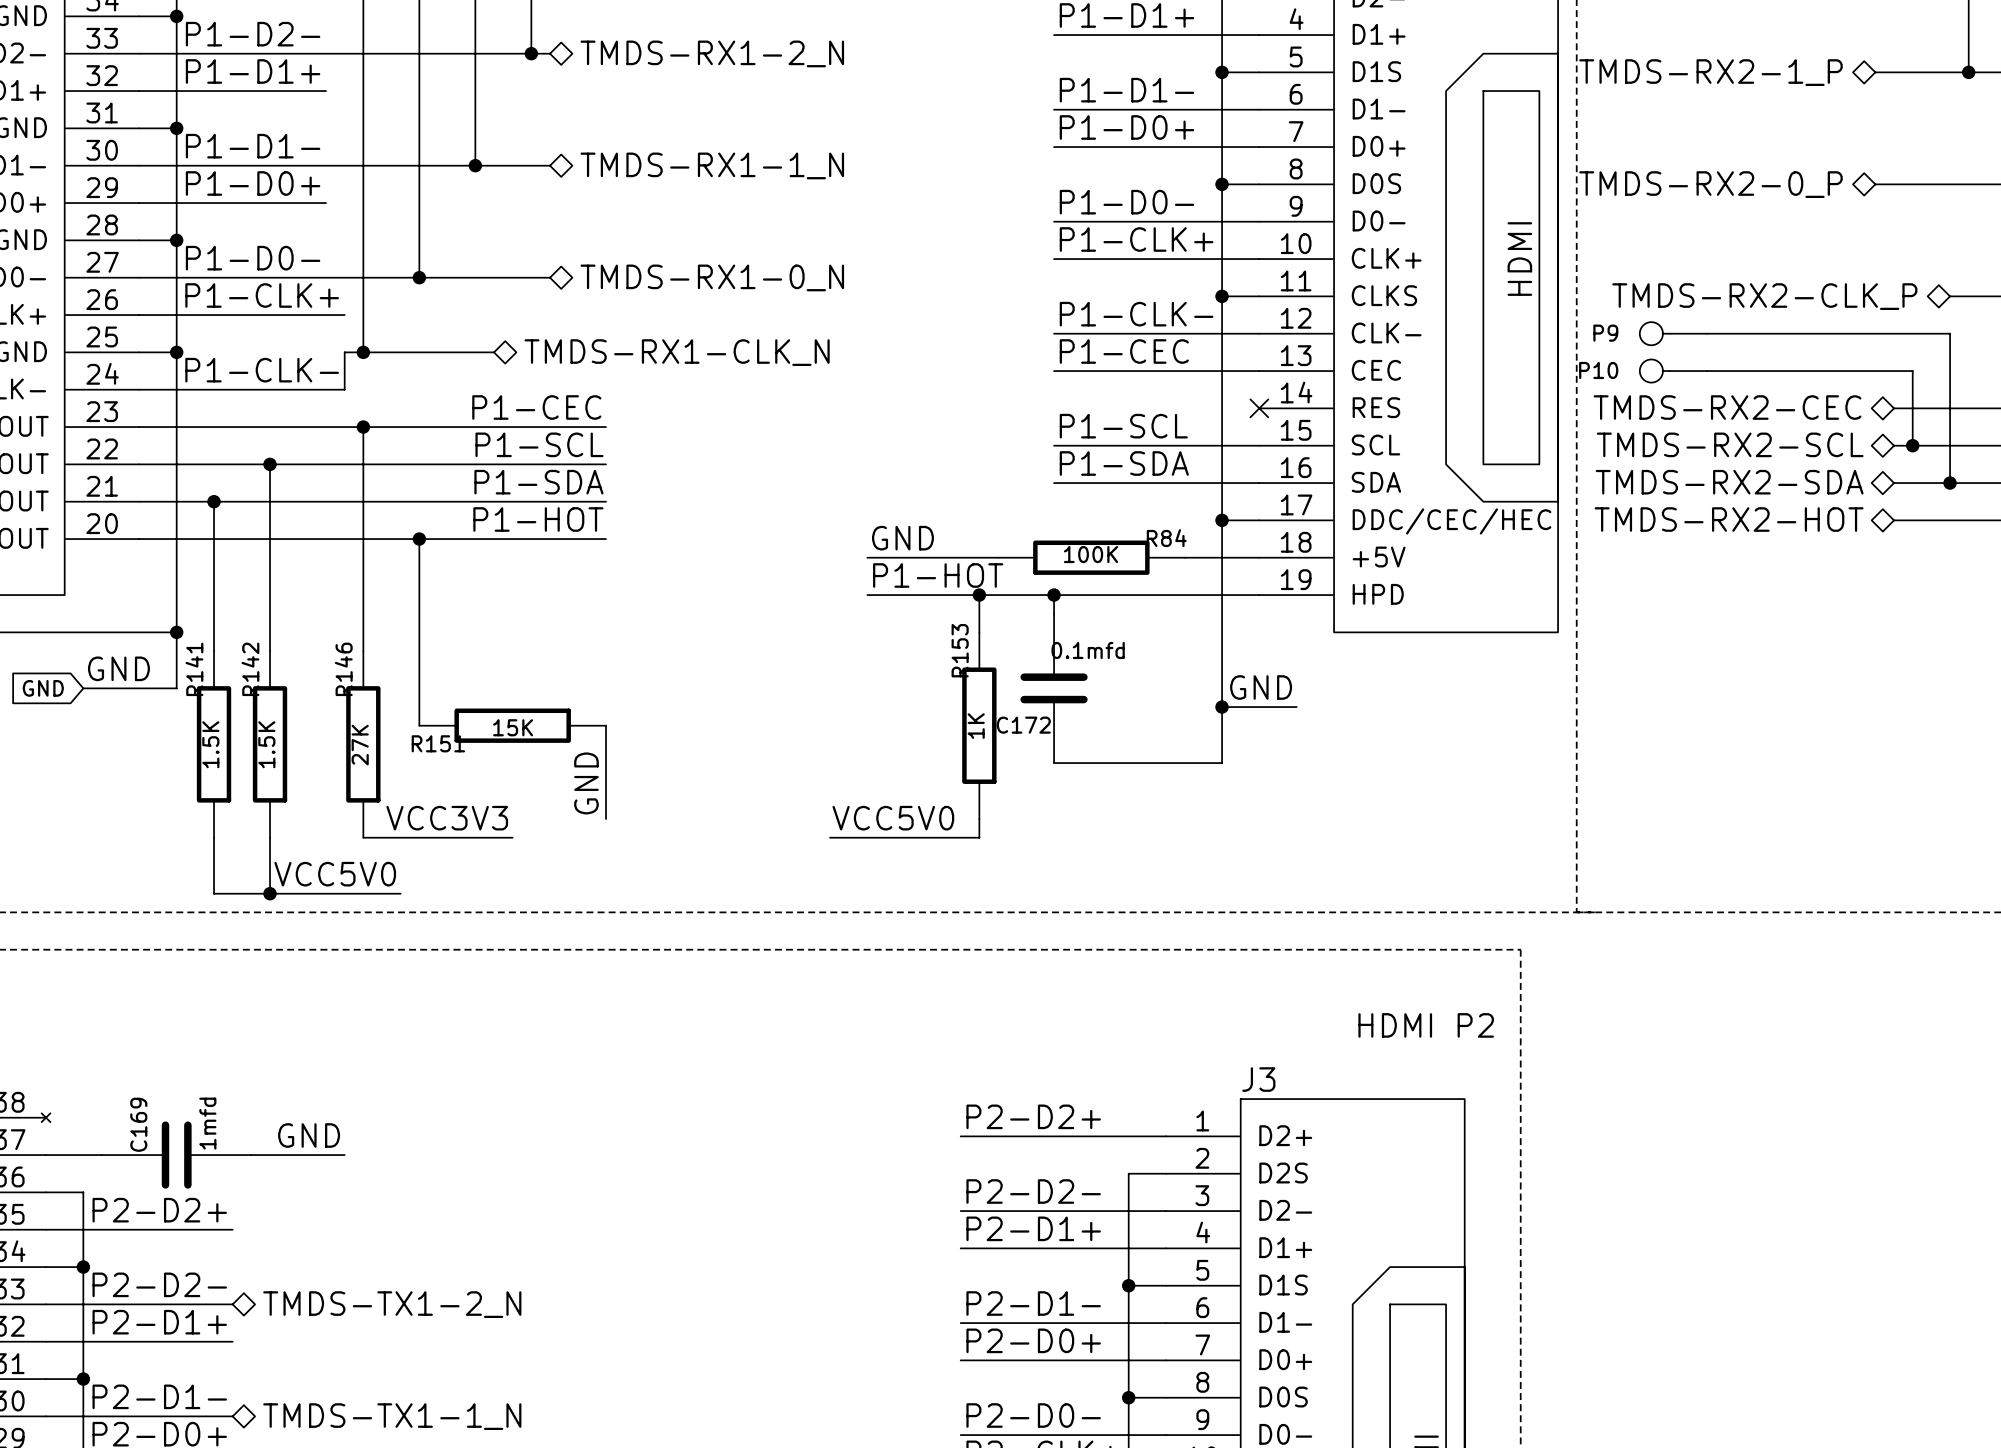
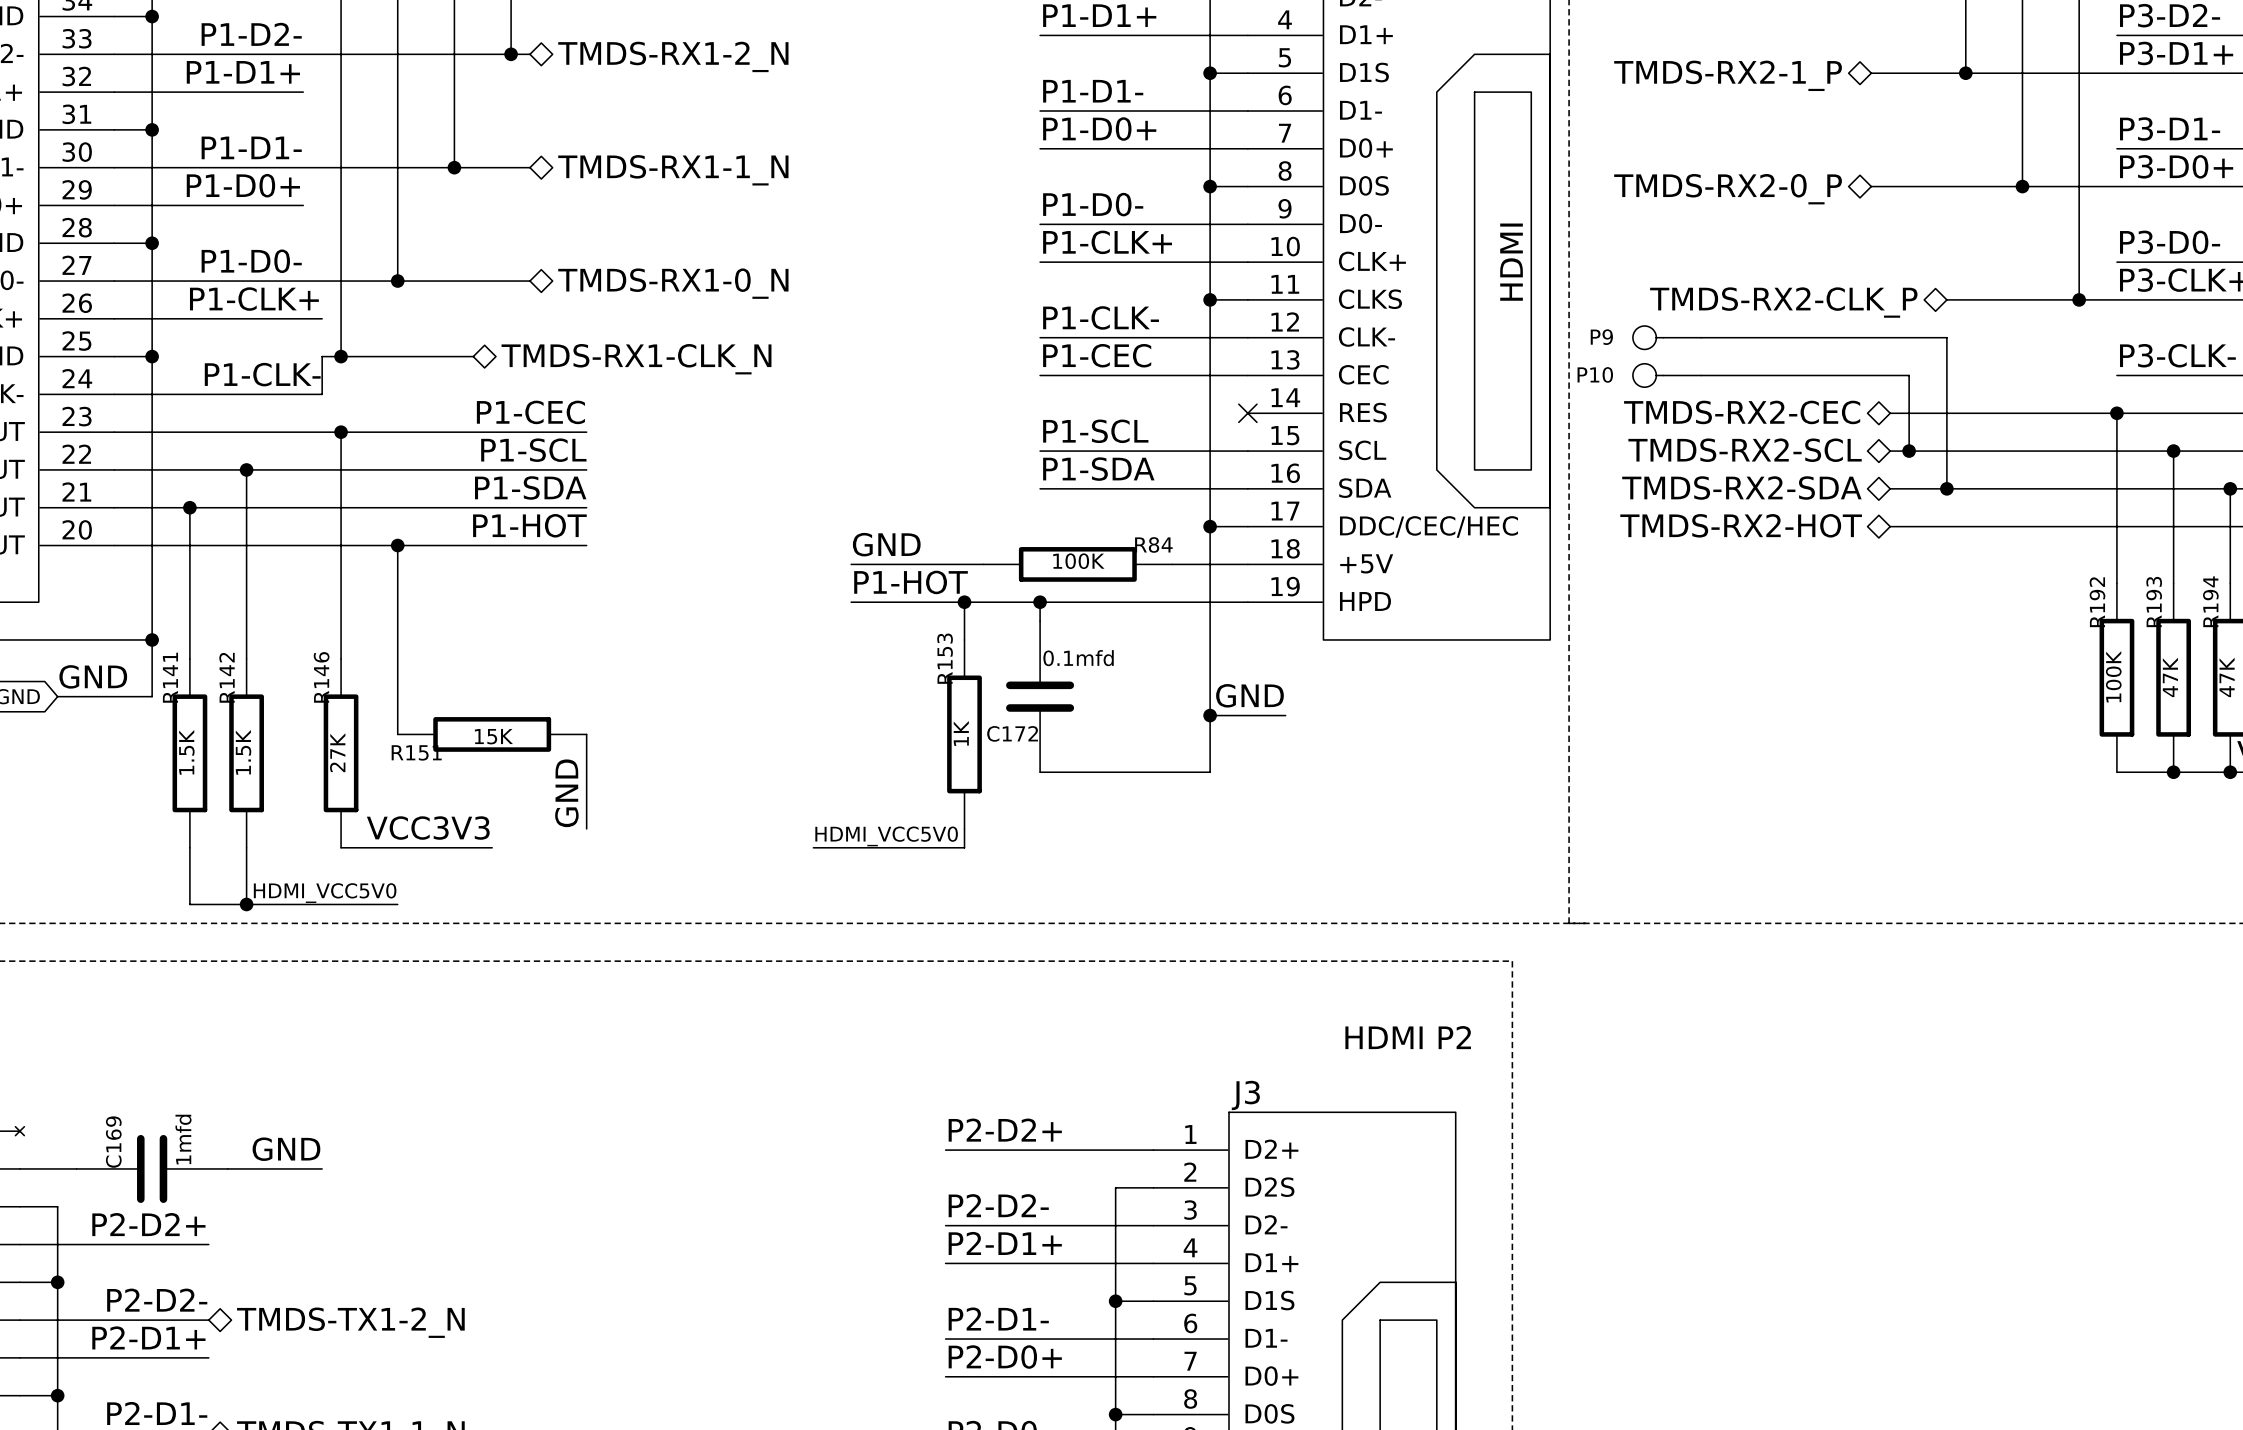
label: VCC5V0 (893, 818) -> HDMI_VCC5V0 (886, 836)
label: VCC5V0 (335, 874) -> HDMI_VCC5V0 (325, 893)
wire: none -> (378, 904) (397, 904)

